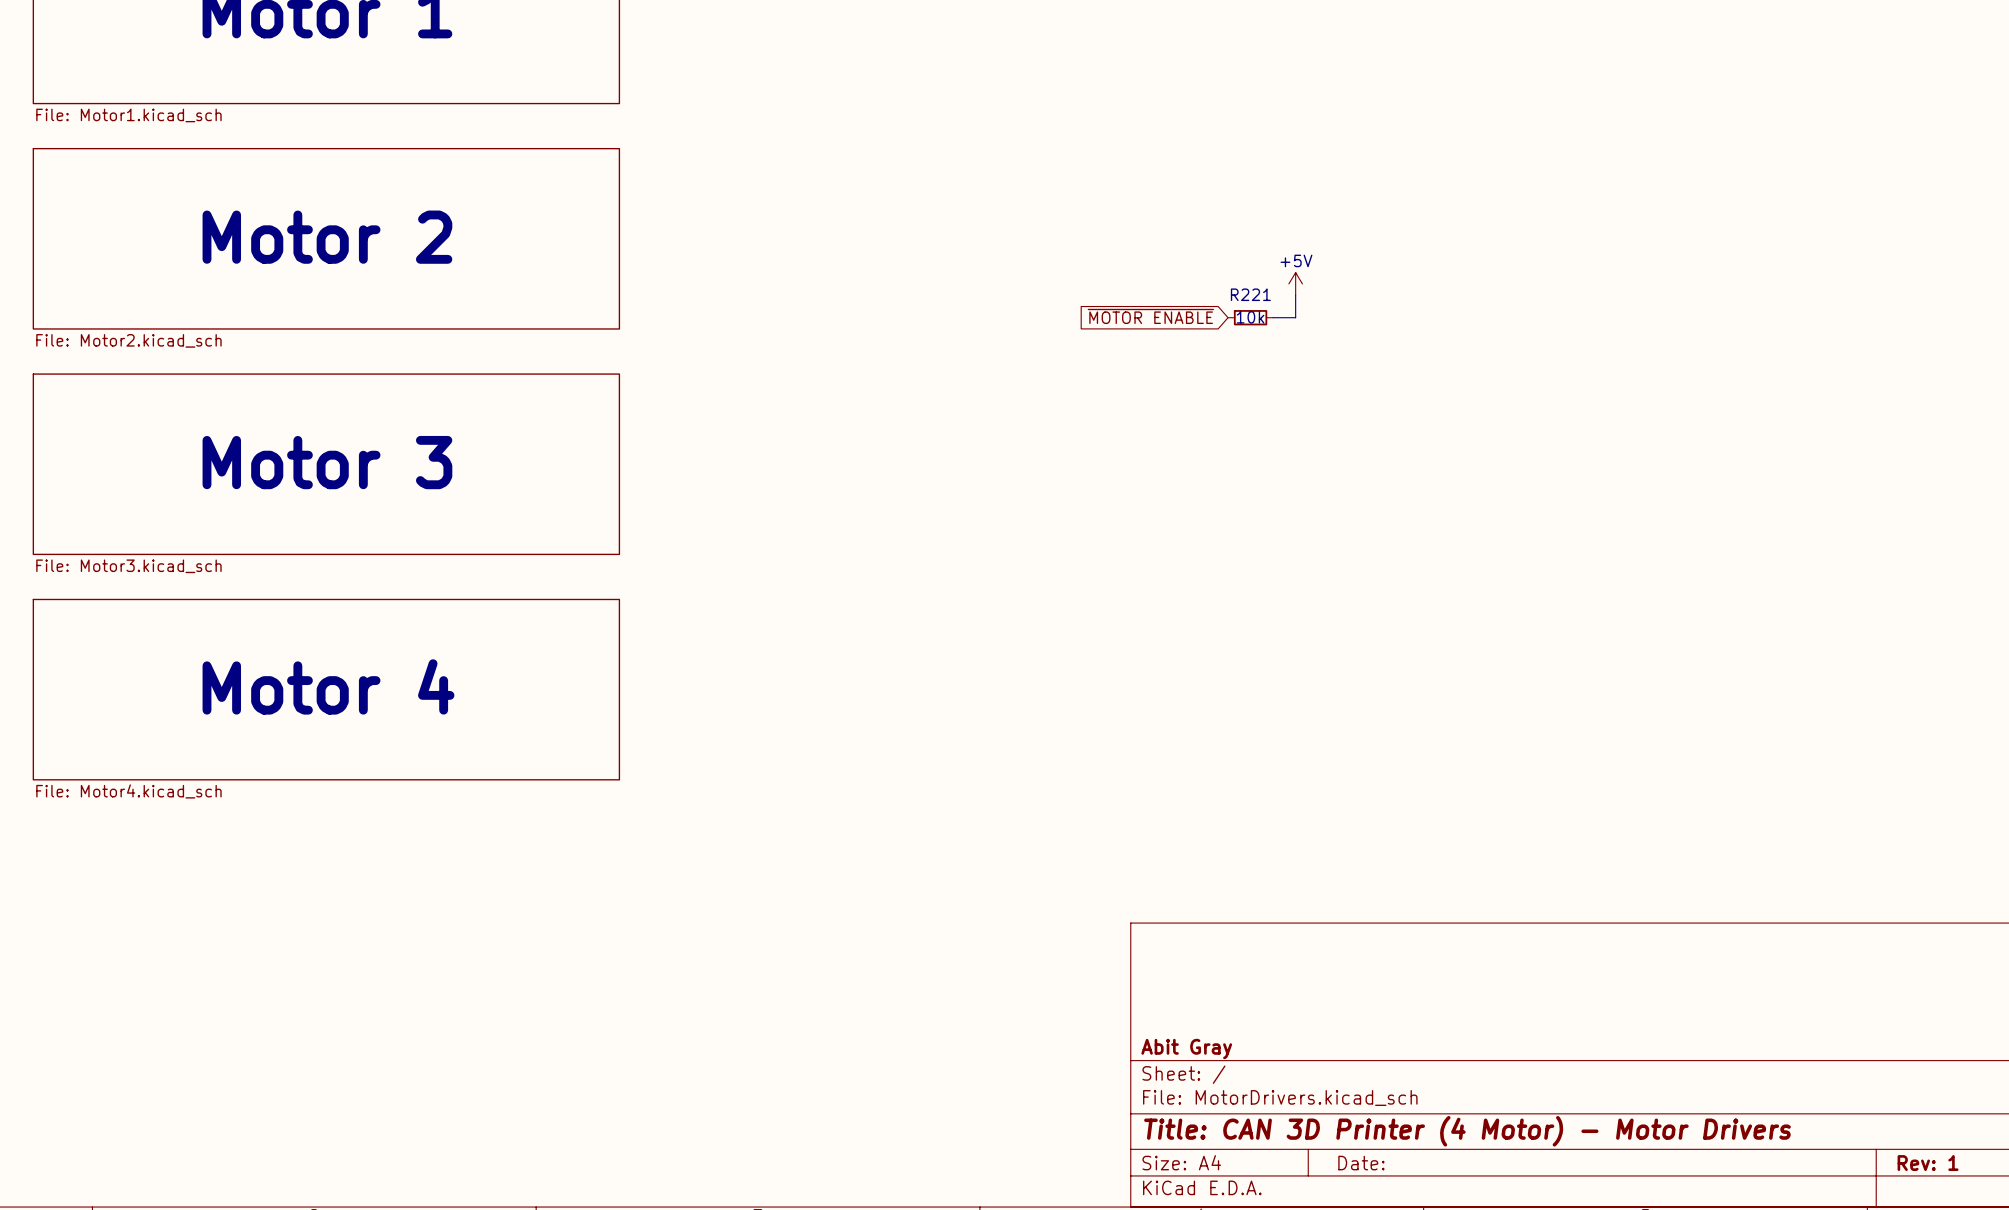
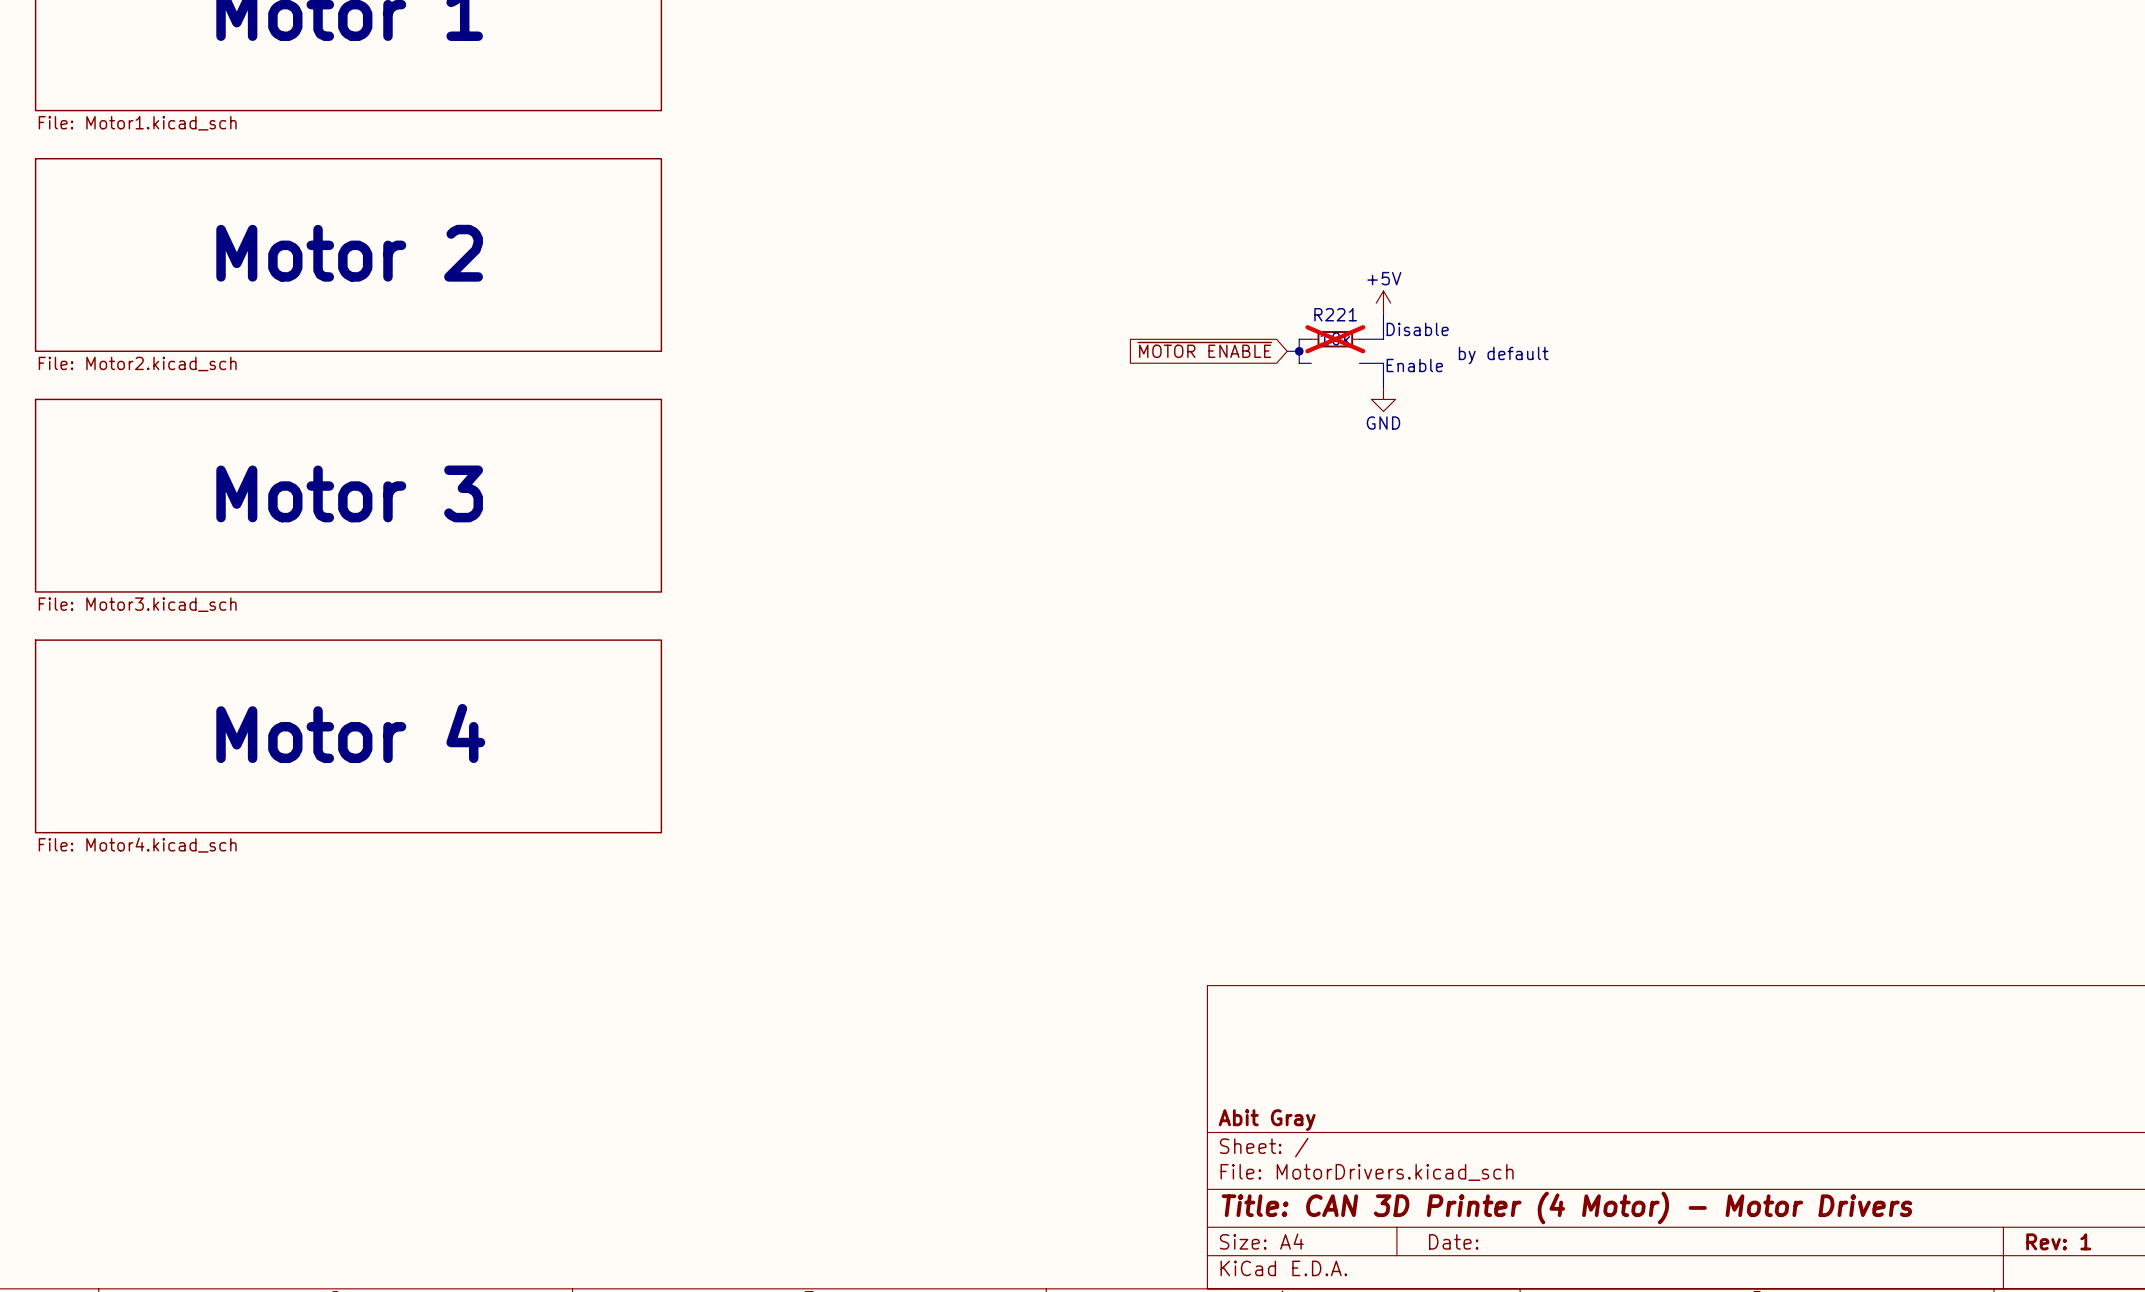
text: none -> Disable (1417, 329)
global label position: ~{MOTOR ENABLE} (1150, 316) -> ~{MOTOR ENABLE} (1204, 349)
wire: none -> (1311, 339) (1299, 339) (1299, 363) (1311, 363)
R221 do-not-place cross: none -> (1335, 339)
junction: none -> (1299, 351)
text: none -> by default (1503, 355)
wire: none -> (1359, 363) (1383, 363) (1383, 387)
text: none -> Enable (1414, 365)
power symbol: none -> GND (1383, 399)

